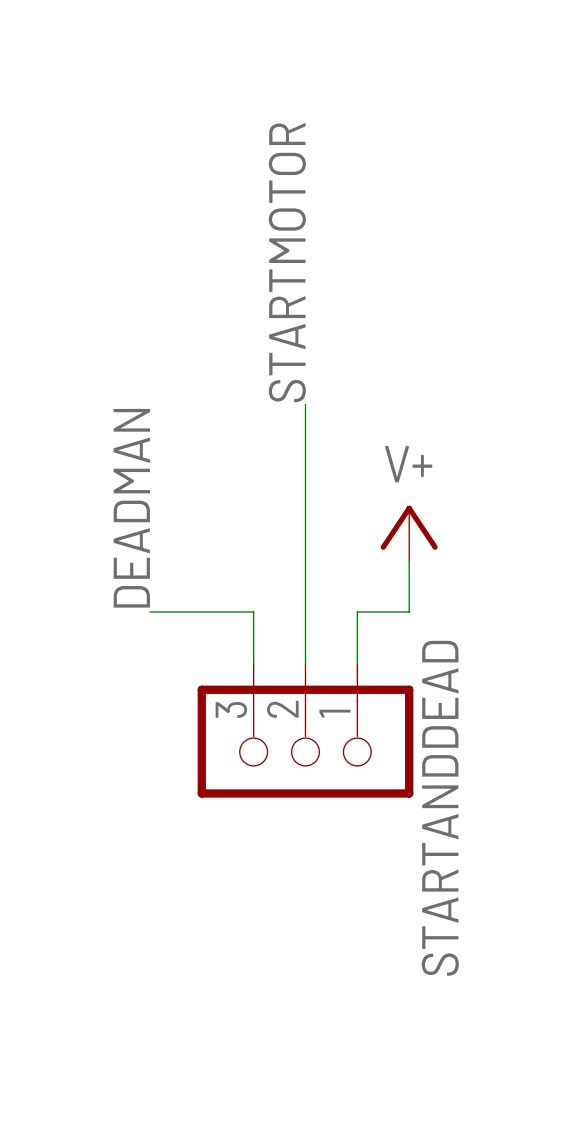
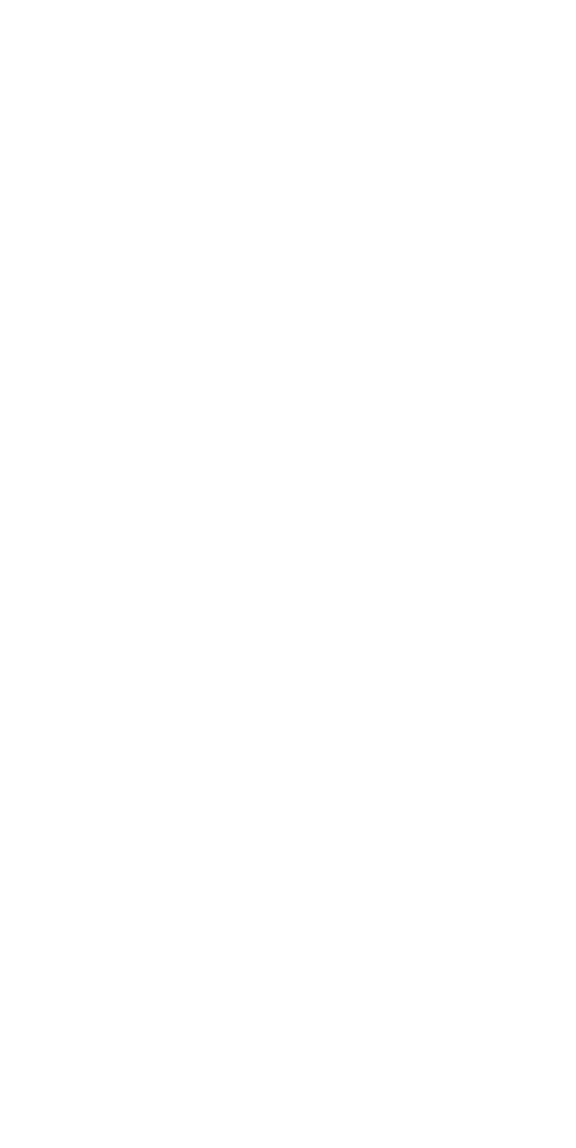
label: STARTMOTOR (287, 262) -> none
wire: (305, 404) (305, 663) -> none
label: DEADMAN (131, 508) -> none
power symbol: V+ (409, 532) -> none
wire: (409, 560) (409, 612) (357, 612) (357, 663) -> none
wire: (149, 612) (253, 612) (253, 663) -> none
STARTANDDEAD: (305, 730) -> none

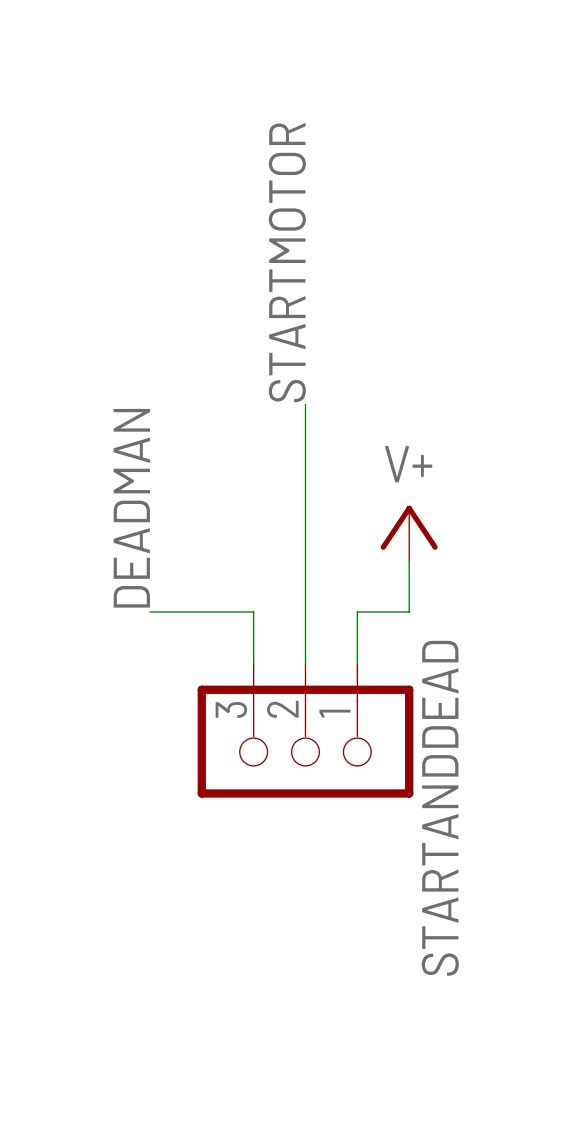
label: none -> STARTMOTOR (287, 262)
wire: none -> (305, 404) (305, 663)
label: none -> DEADMAN (131, 508)
power symbol: none -> V+ (409, 532)
wire: none -> (409, 560) (409, 612) (357, 612) (357, 663)
wire: none -> (149, 612) (253, 612) (253, 663)
STARTANDDEAD: none -> (305, 730)

